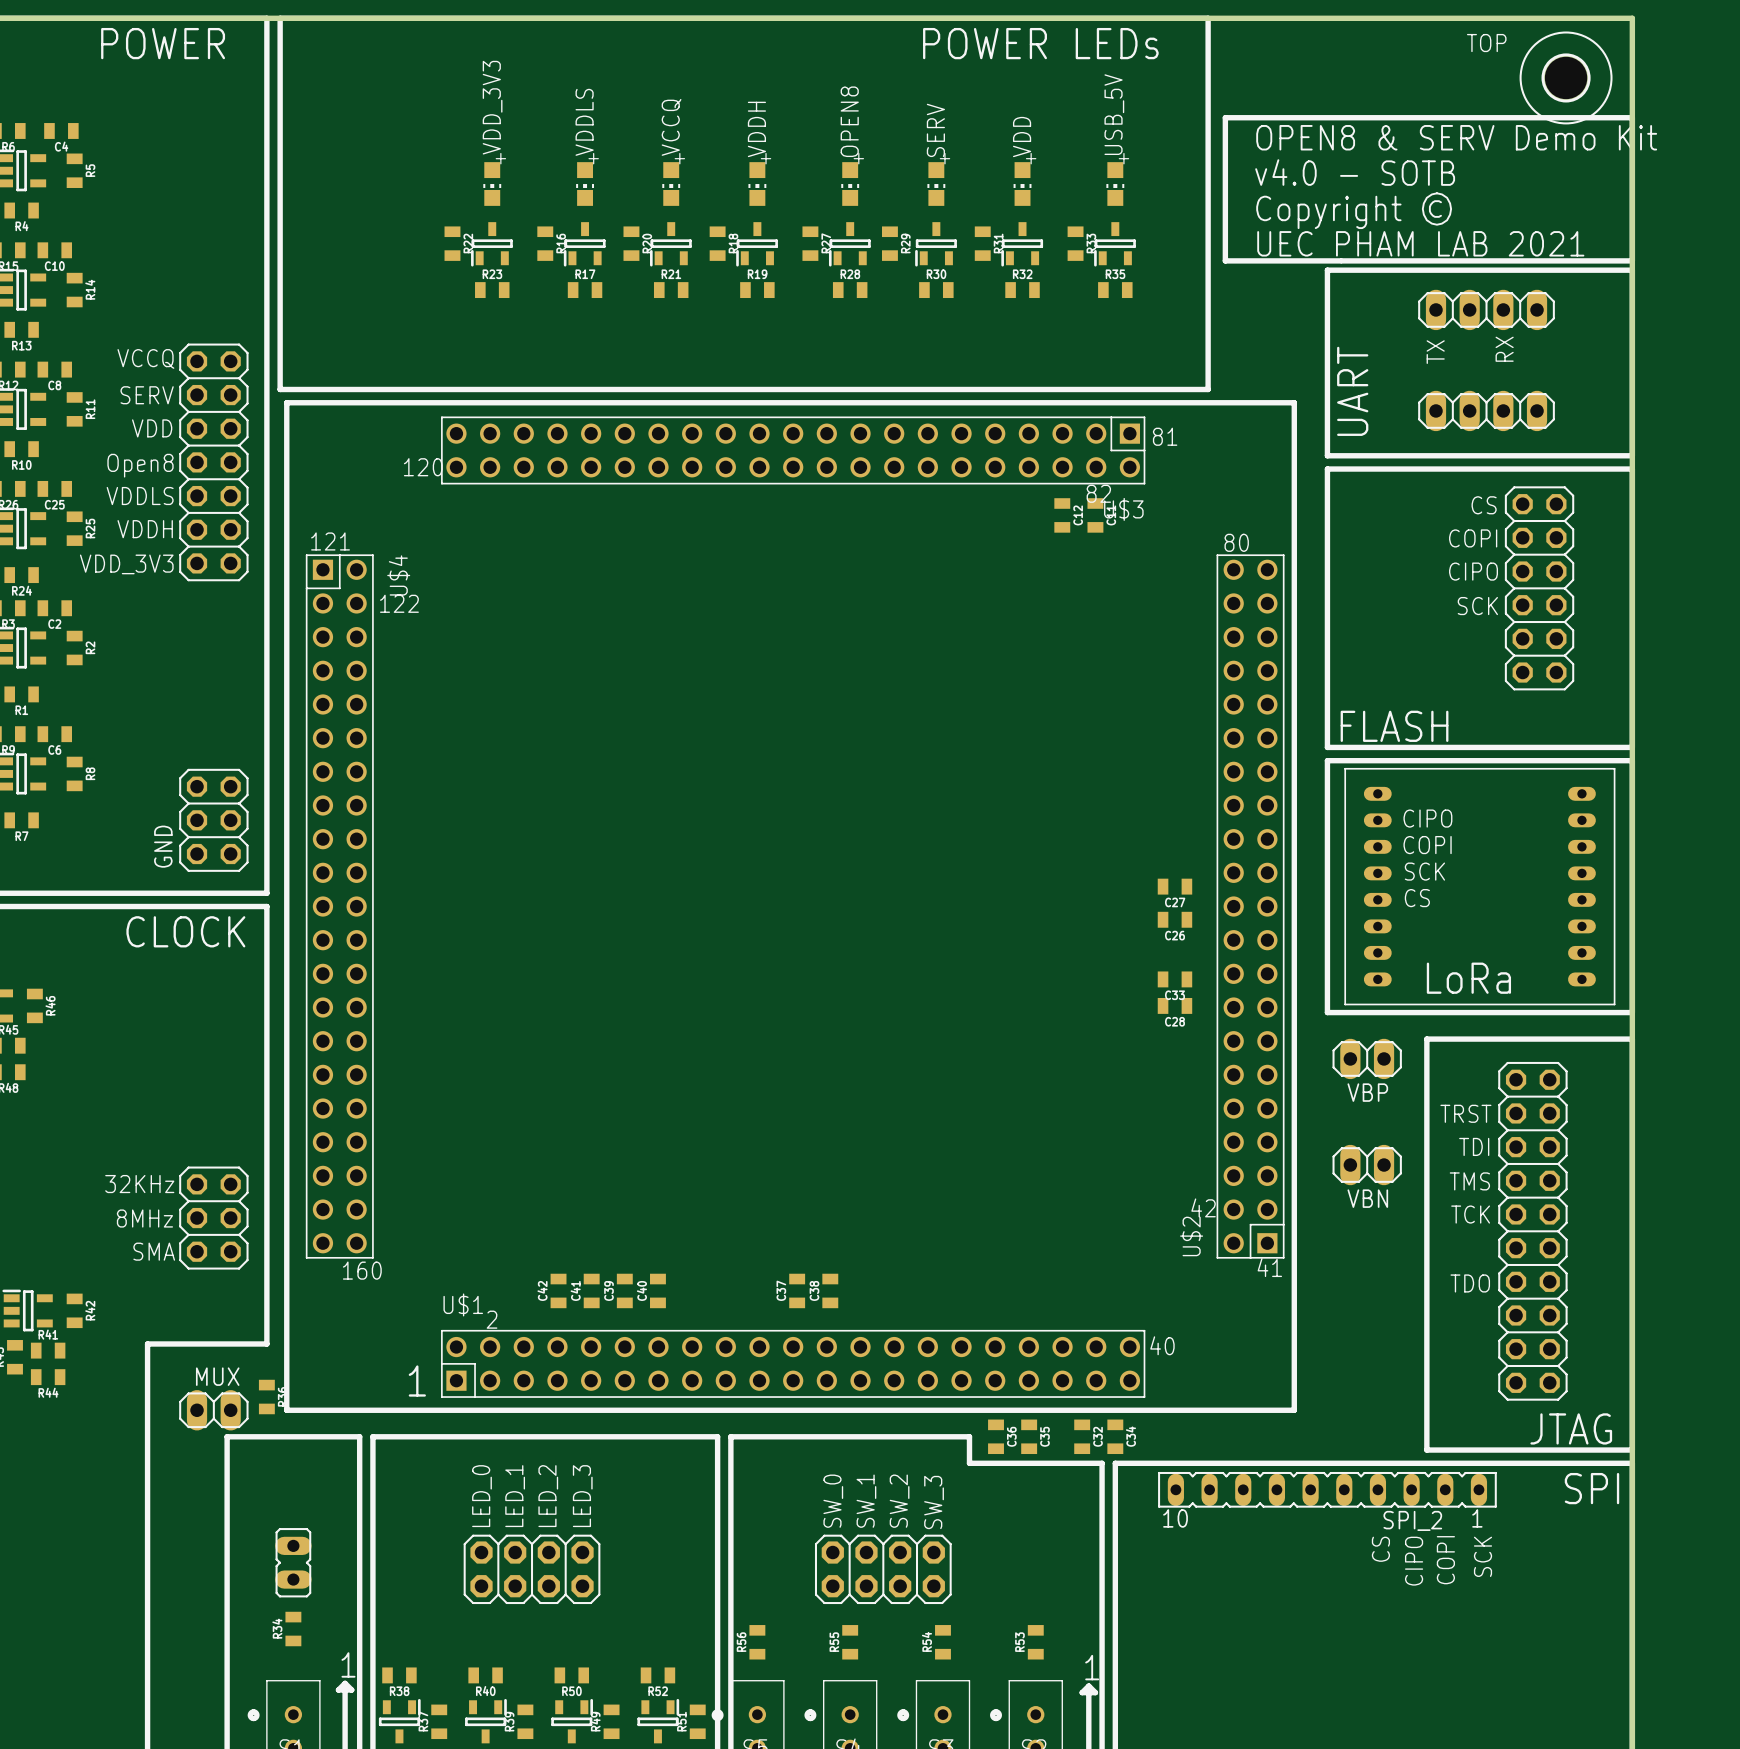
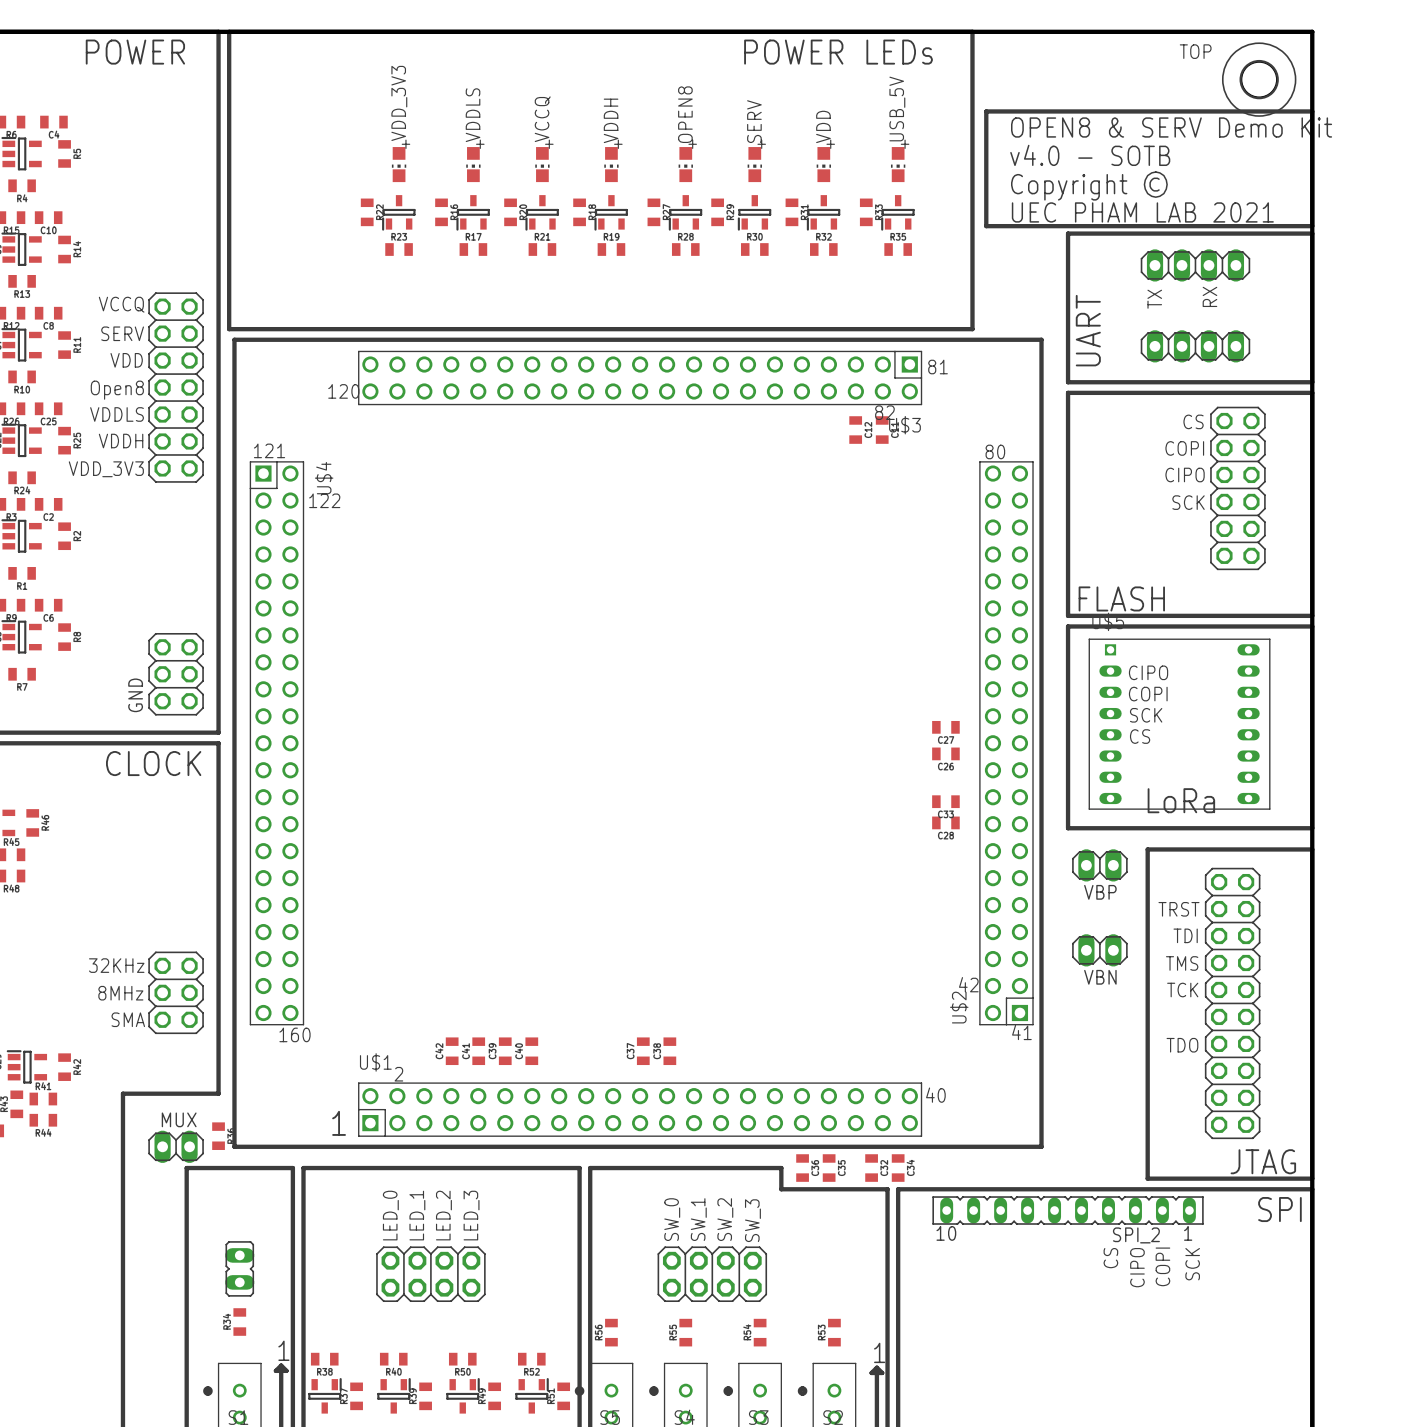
part: none -> (1179, 724)
part: (1479, 886) -> none

